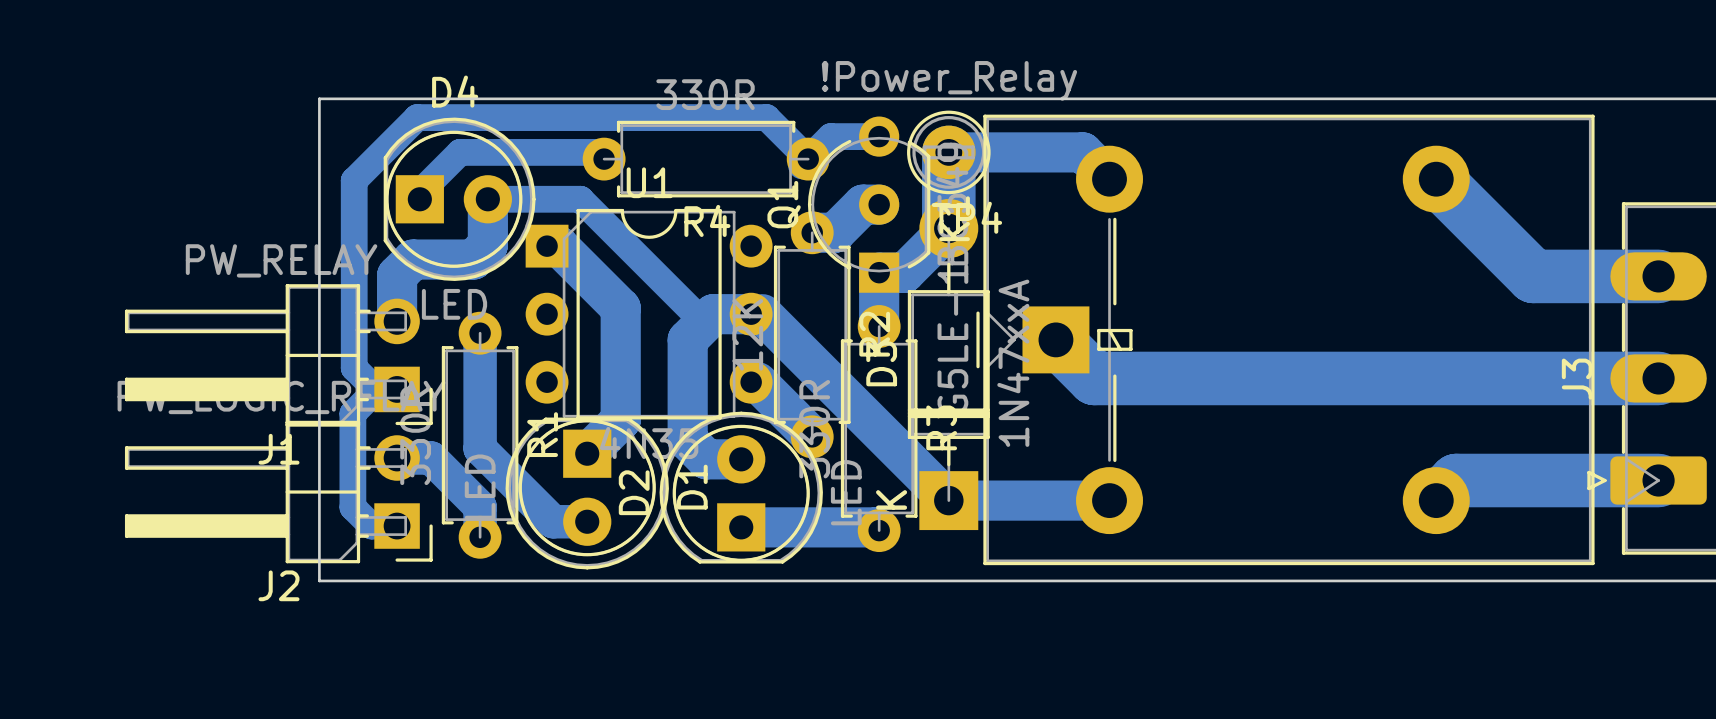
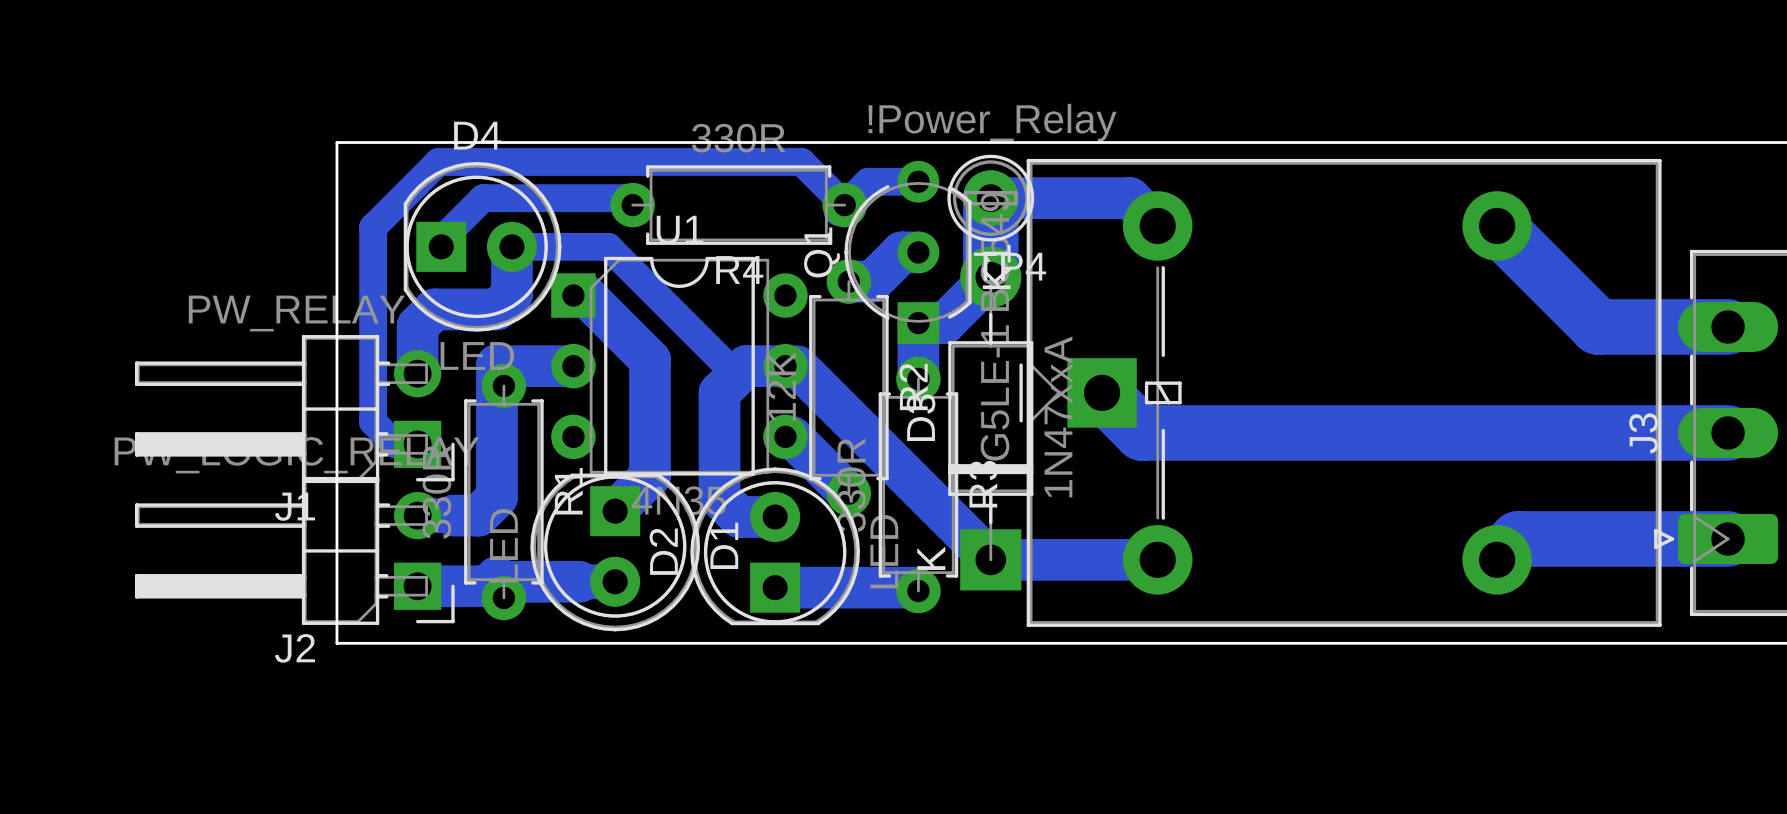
bottom track: (480, 333) (480, 448) (553, 521) -> (417, 586) (487, 586) (496, 577) (501, 581) (579, 581)
bottom track: (376, 389) (352, 413) (352, 507) (371, 526) (397, 526) -> none
bottom track: (431, 458) (480, 506) (480, 537) -> (453, 515) (478, 515) (496, 497) (496, 365) (573, 366)

